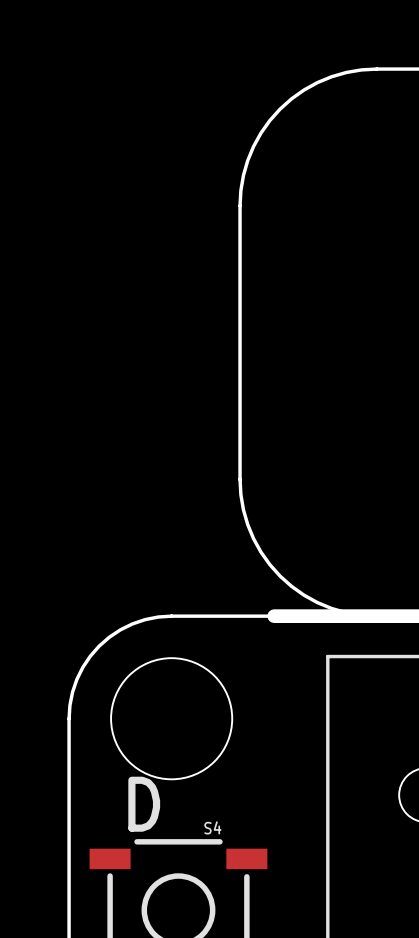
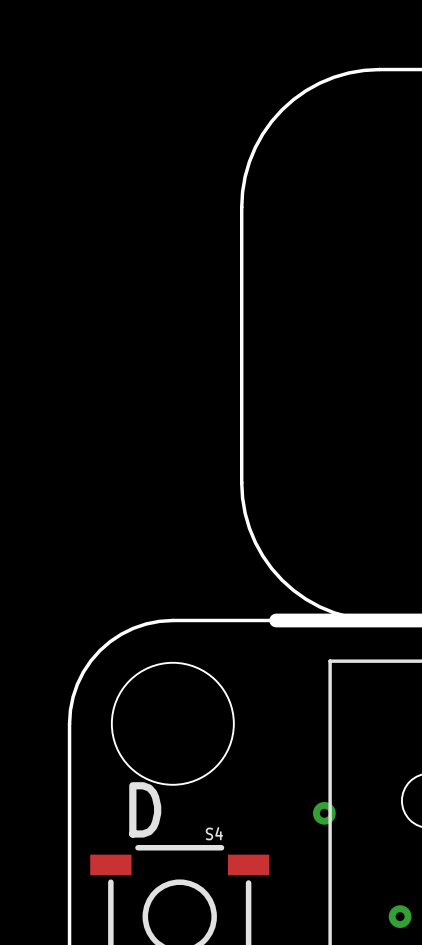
via: none -> (324, 813)
via: none -> (400, 916)

